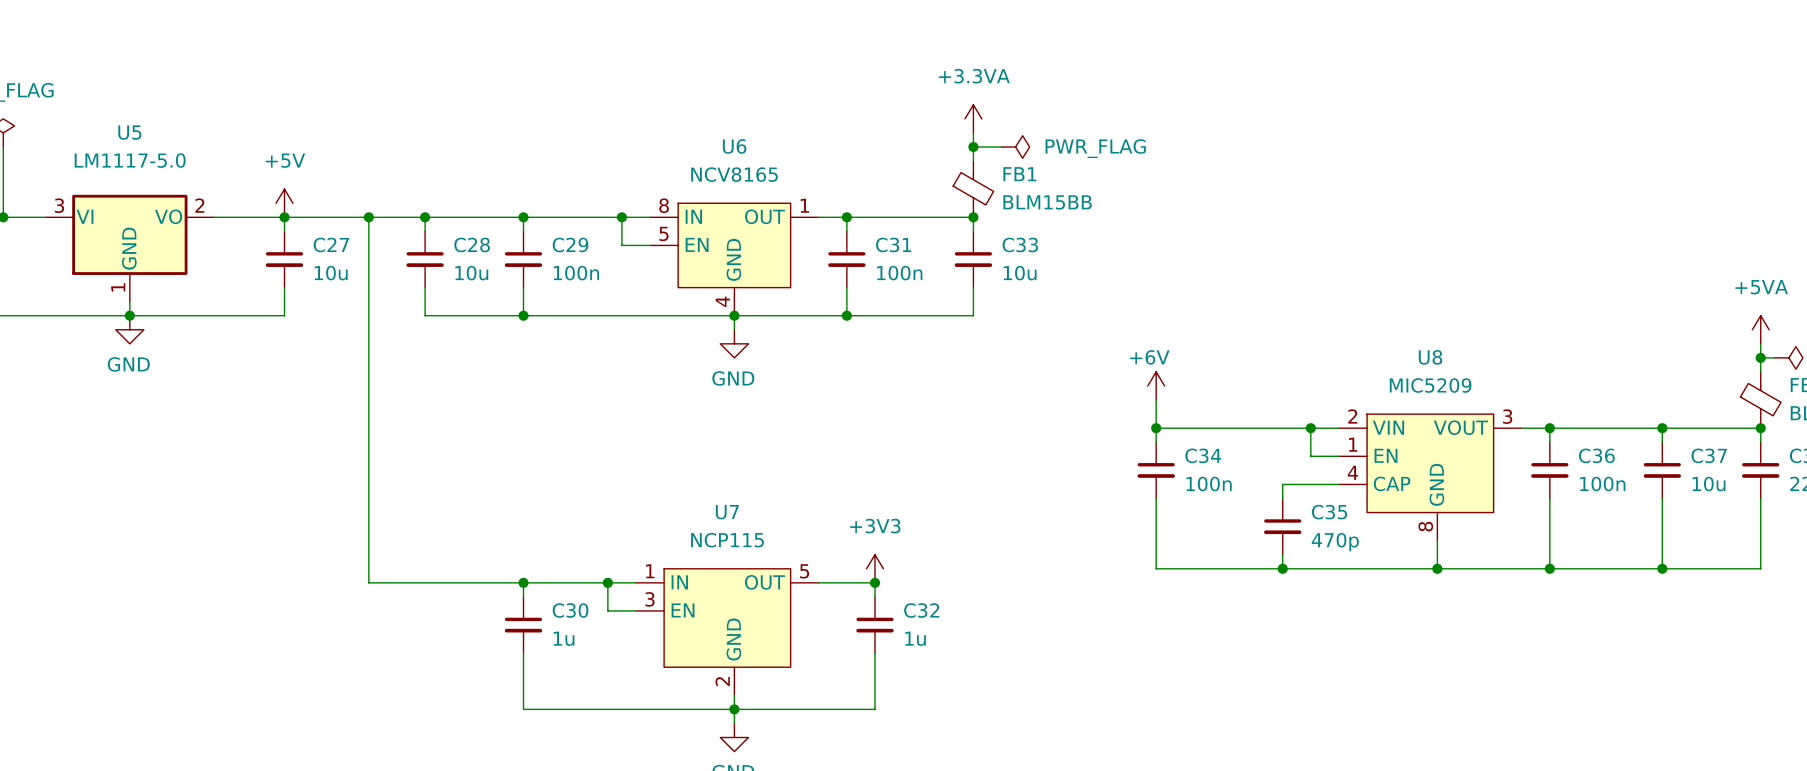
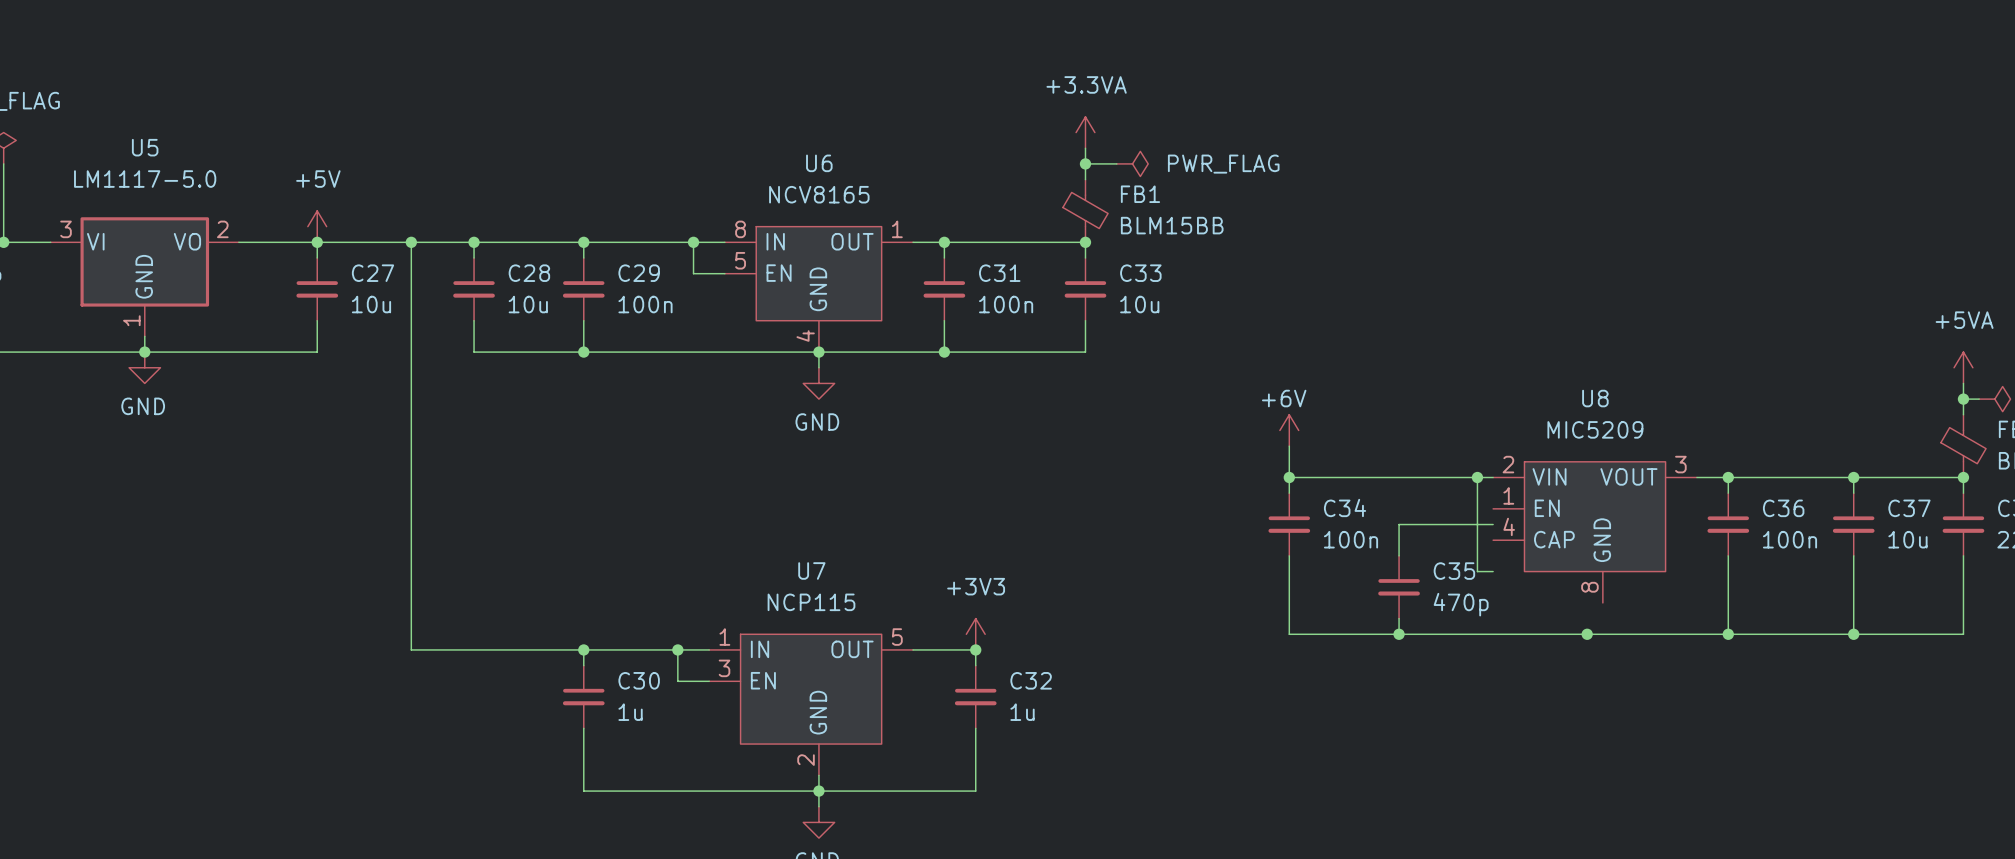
wire: (1310, 428) (1310, 456) (1338, 456) -> none
junction position: (1310, 428) -> (1477, 477)
wire: none -> (1477, 477) (1477, 571) (1493, 571)
wire: none -> (1493, 524) (1399, 524) (1399, 555)
wire: (1338, 484) (1282, 484) (1282, 498) -> none
C35 position: (1282, 526) -> (1399, 587)
wire: (1437, 540) (1437, 568) -> none
wire: (1282, 554) (1282, 568) -> (1399, 618) (1399, 634)
junction position: (1282, 568) -> (1399, 634)
junction position: (1437, 568) -> (1587, 634)

